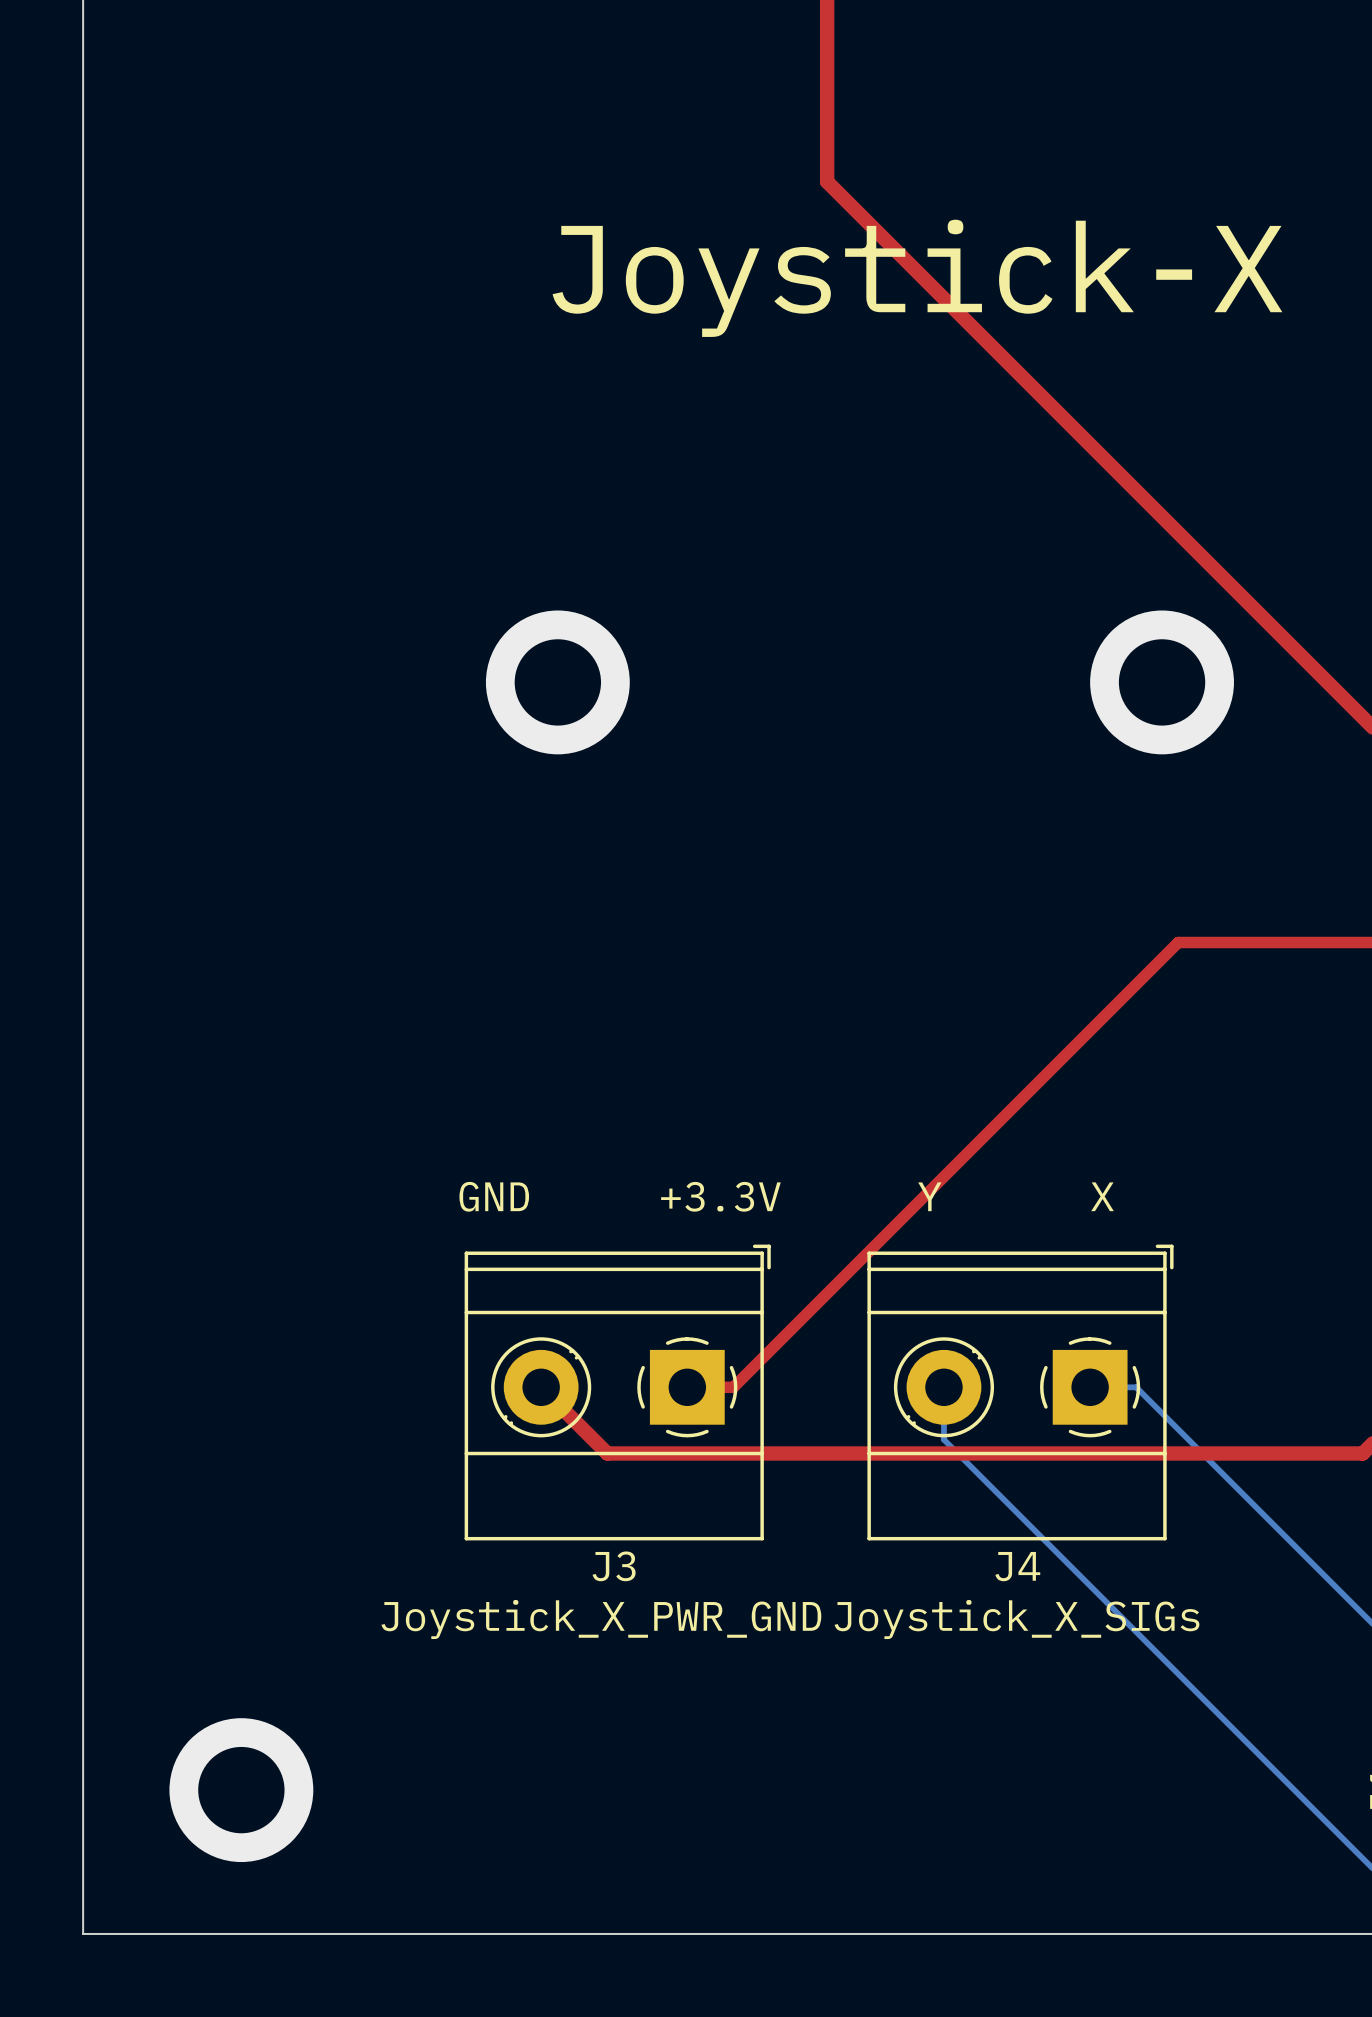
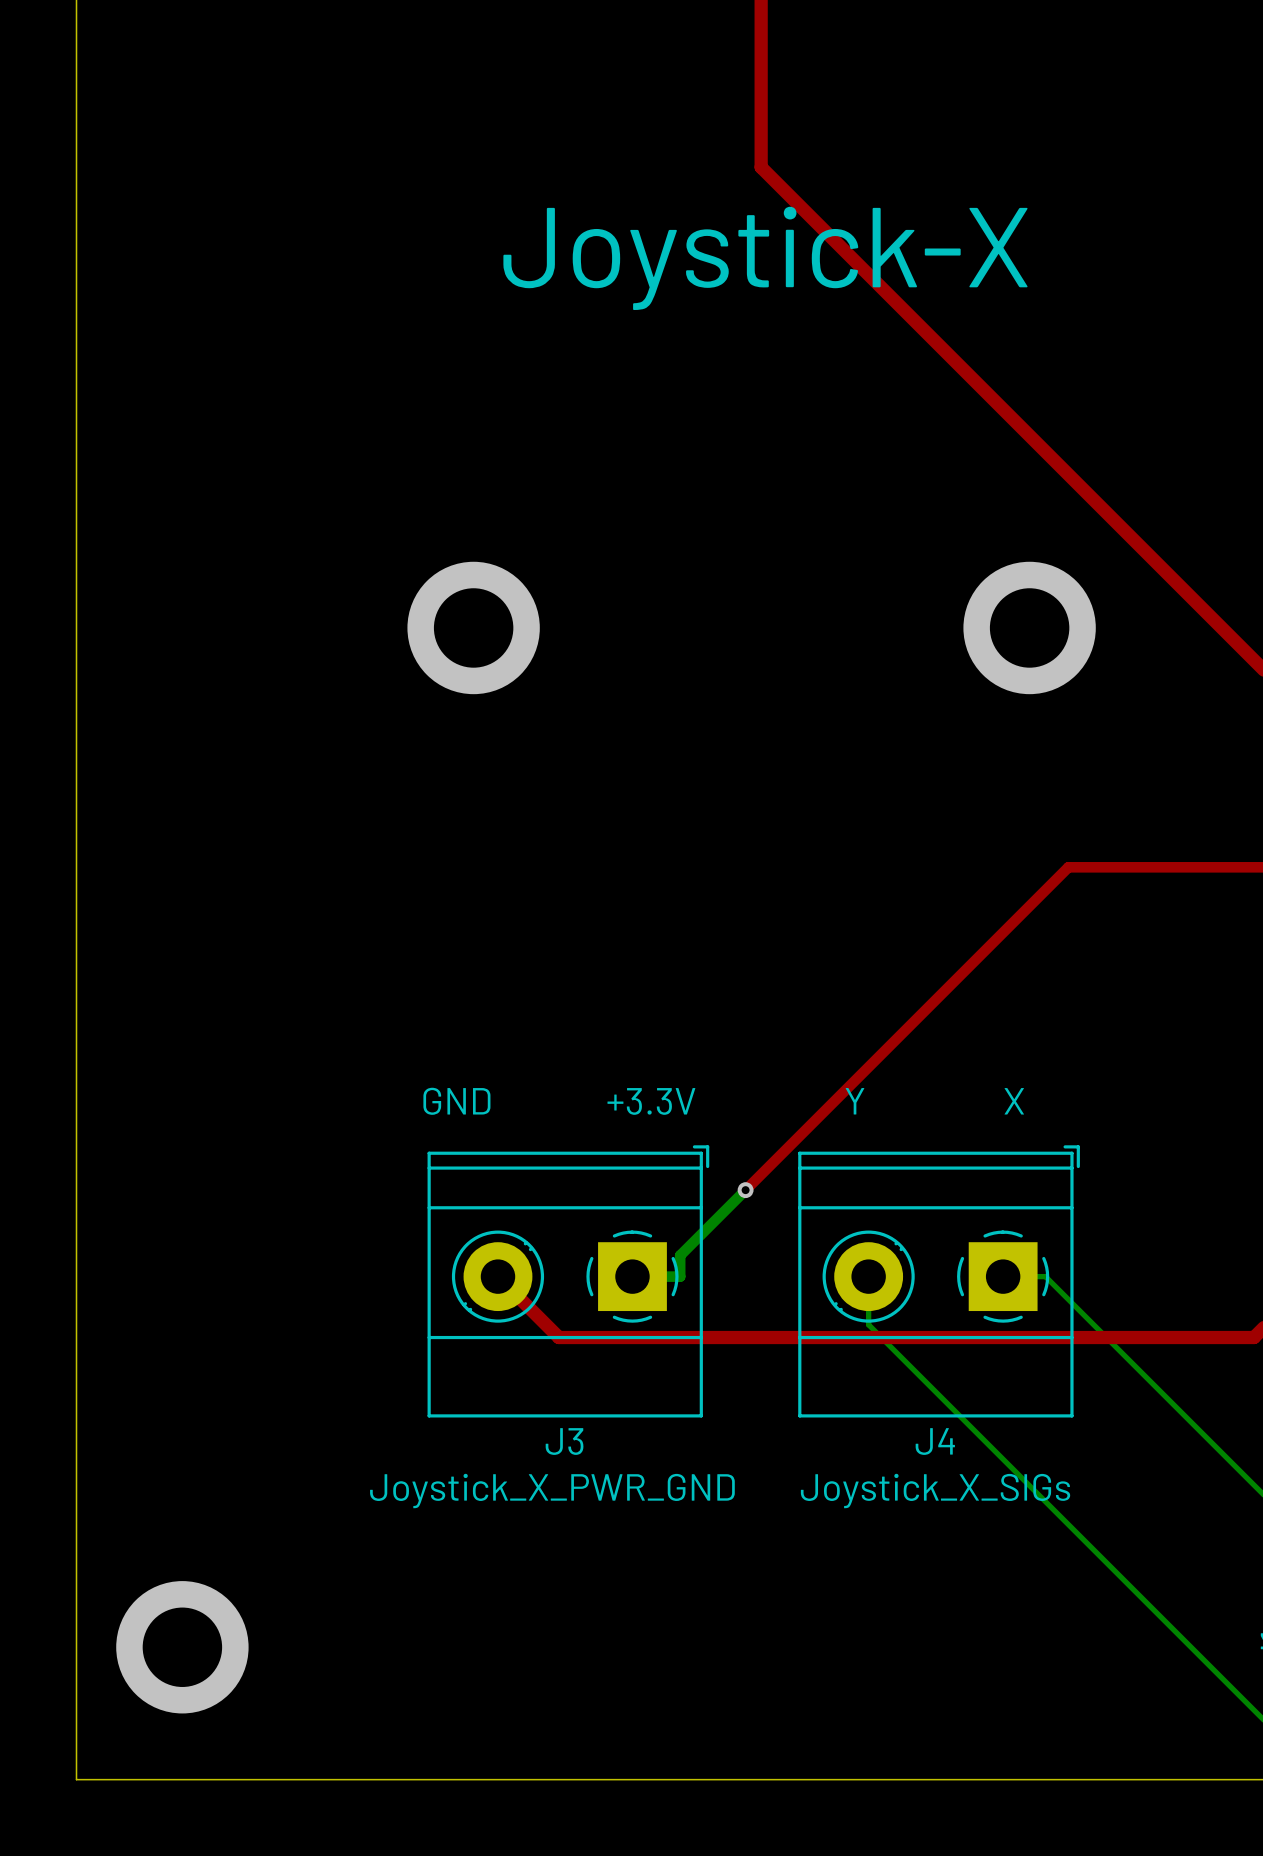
via position: (557, 682) -> (473, 627)
via position: (1162, 682) -> (1029, 627)
top track: (1178, 942) (733, 1387) (687, 1387) -> (1084, 867) (1068, 867) (745, 1190)
bottom track: none -> (745, 1190) (680, 1255) (680, 1276) (632, 1276)
via: none -> (745, 1190)
via position: (241, 1790) -> (182, 1647)

